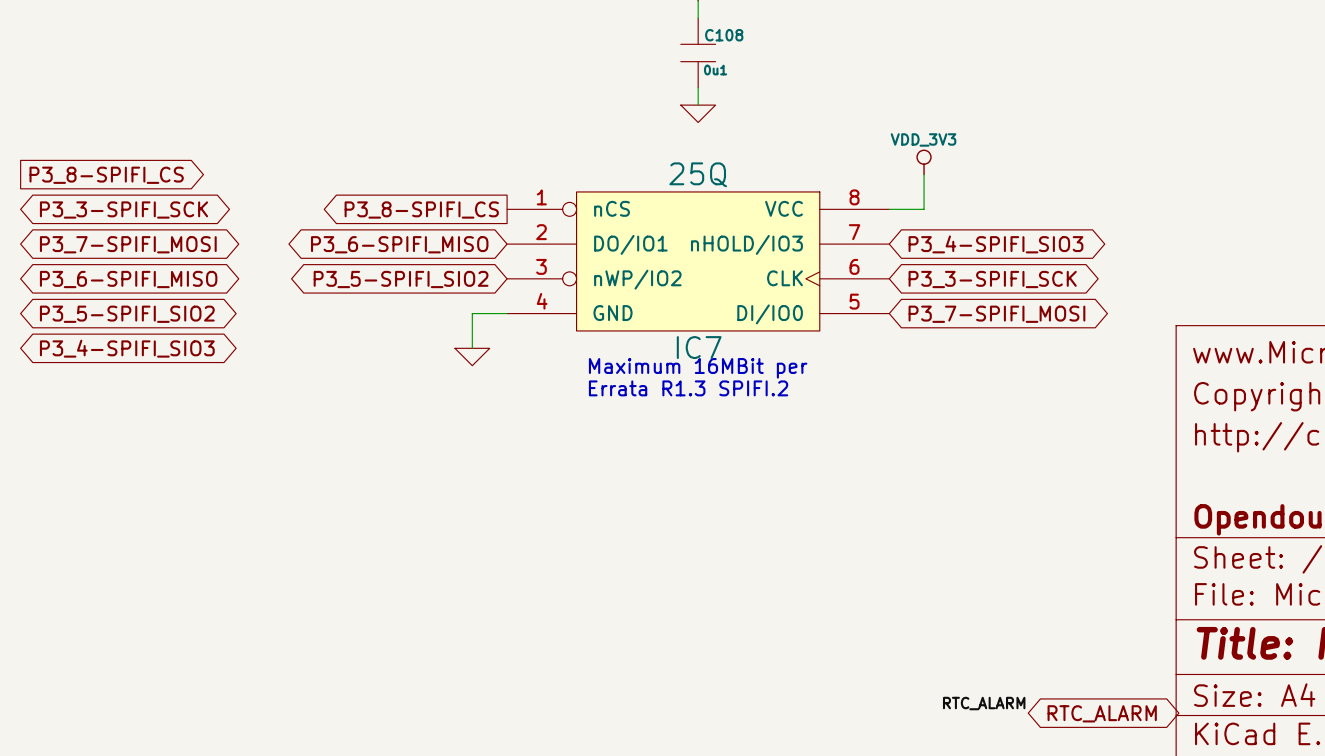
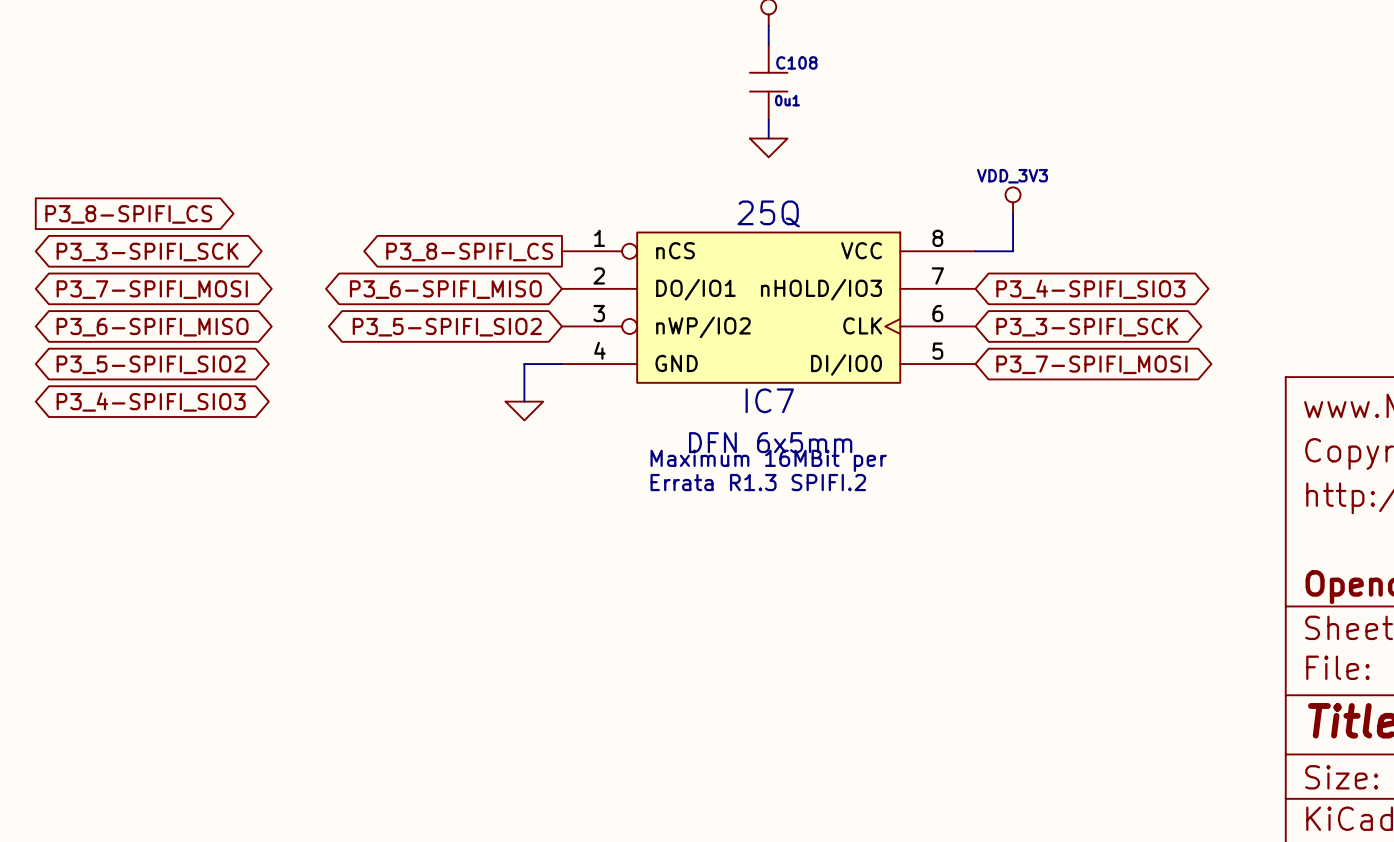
text: Maximum 16MBit per (698, 368) -> none
text: none -> DFN 6x5mm (770, 442)
text: Errata R1.3 SPIFI.2 (688, 388) -> Maximum 16MBit per (768, 460)
text: none -> Errata R1.3 SPIFI.2 (758, 482)
label: RTC_ALARM (984, 703) -> none
global label: RTC_ALARM (1102, 713) -> none

